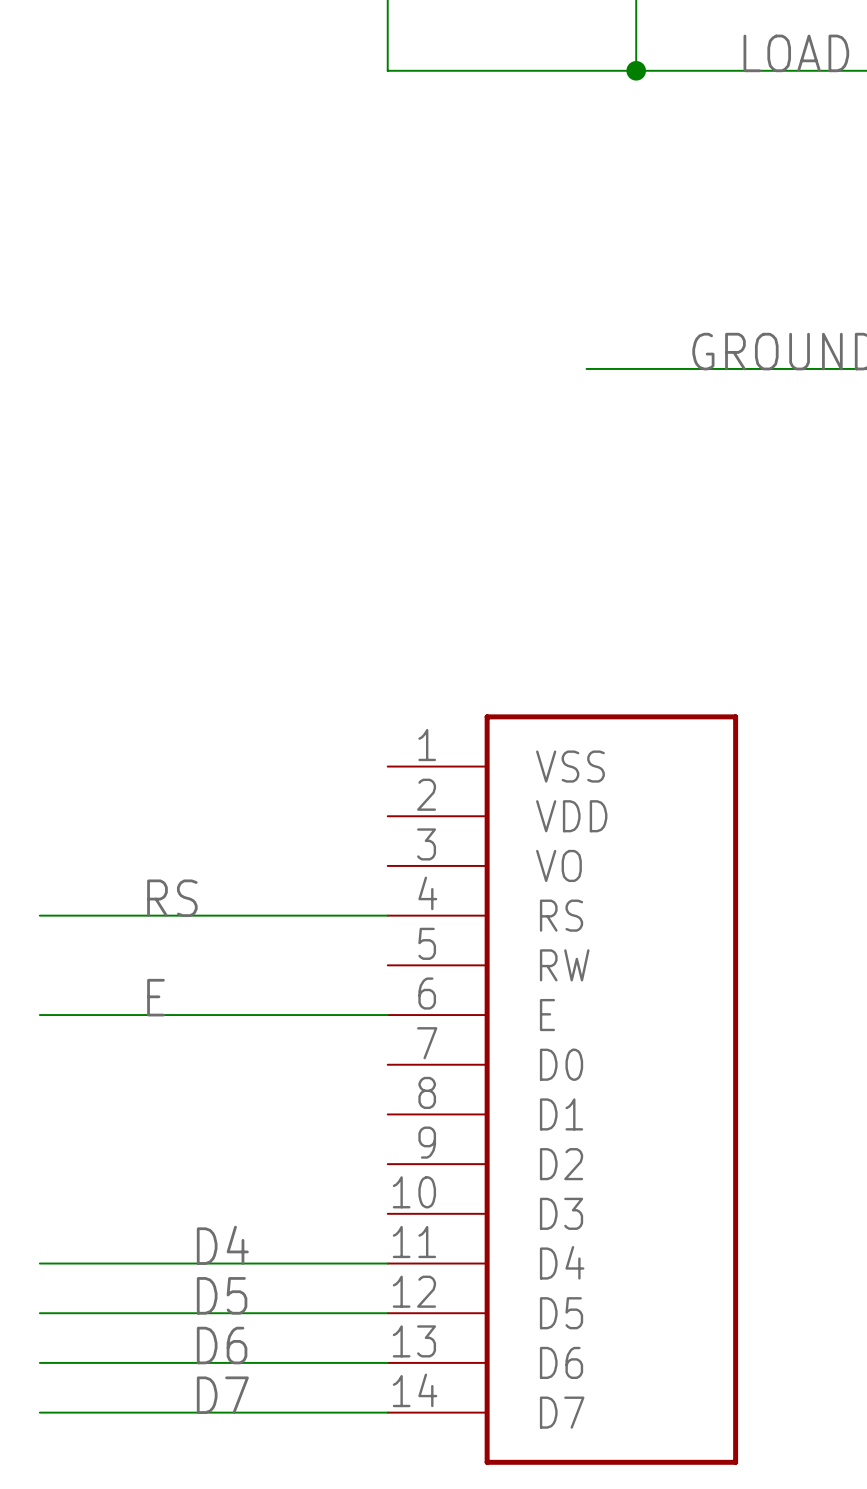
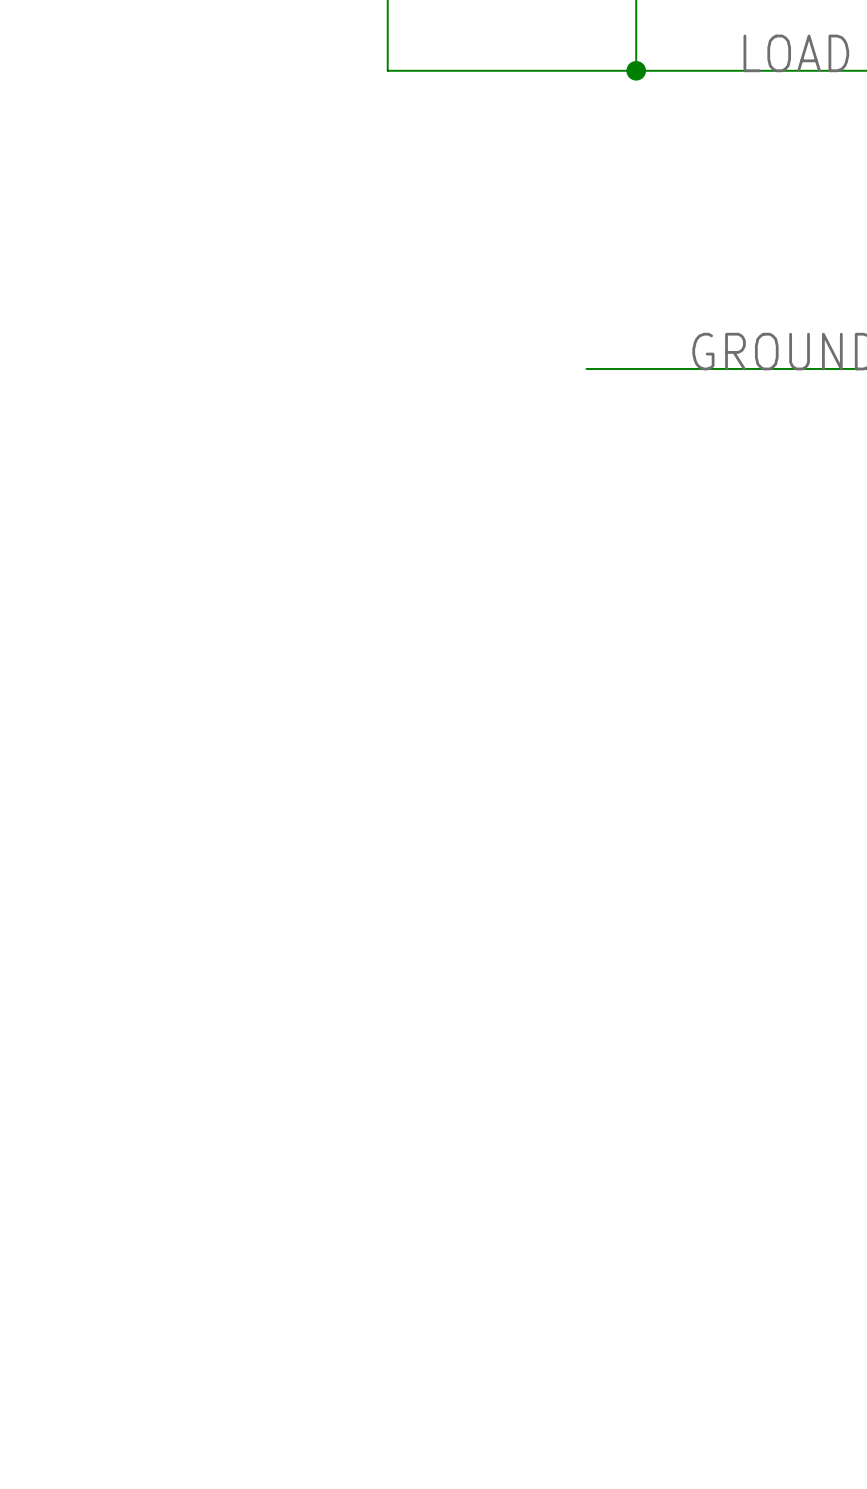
label: RS (172, 898) -> none
wire: (39, 915) (387, 915) -> none
label: E (155, 997) -> none
wire: (39, 1015) (387, 1015) -> none
part: (562, 1089) -> none
label: D4 (222, 1245) -> none
wire: (39, 1263) (387, 1263) -> none
label: D5 (222, 1295) -> none
wire: (39, 1313) (387, 1313) -> none
label: D6 (222, 1345) -> none
wire: (39, 1362) (387, 1362) -> none
label: D7 (222, 1395) -> none
wire: (39, 1412) (387, 1412) -> none

